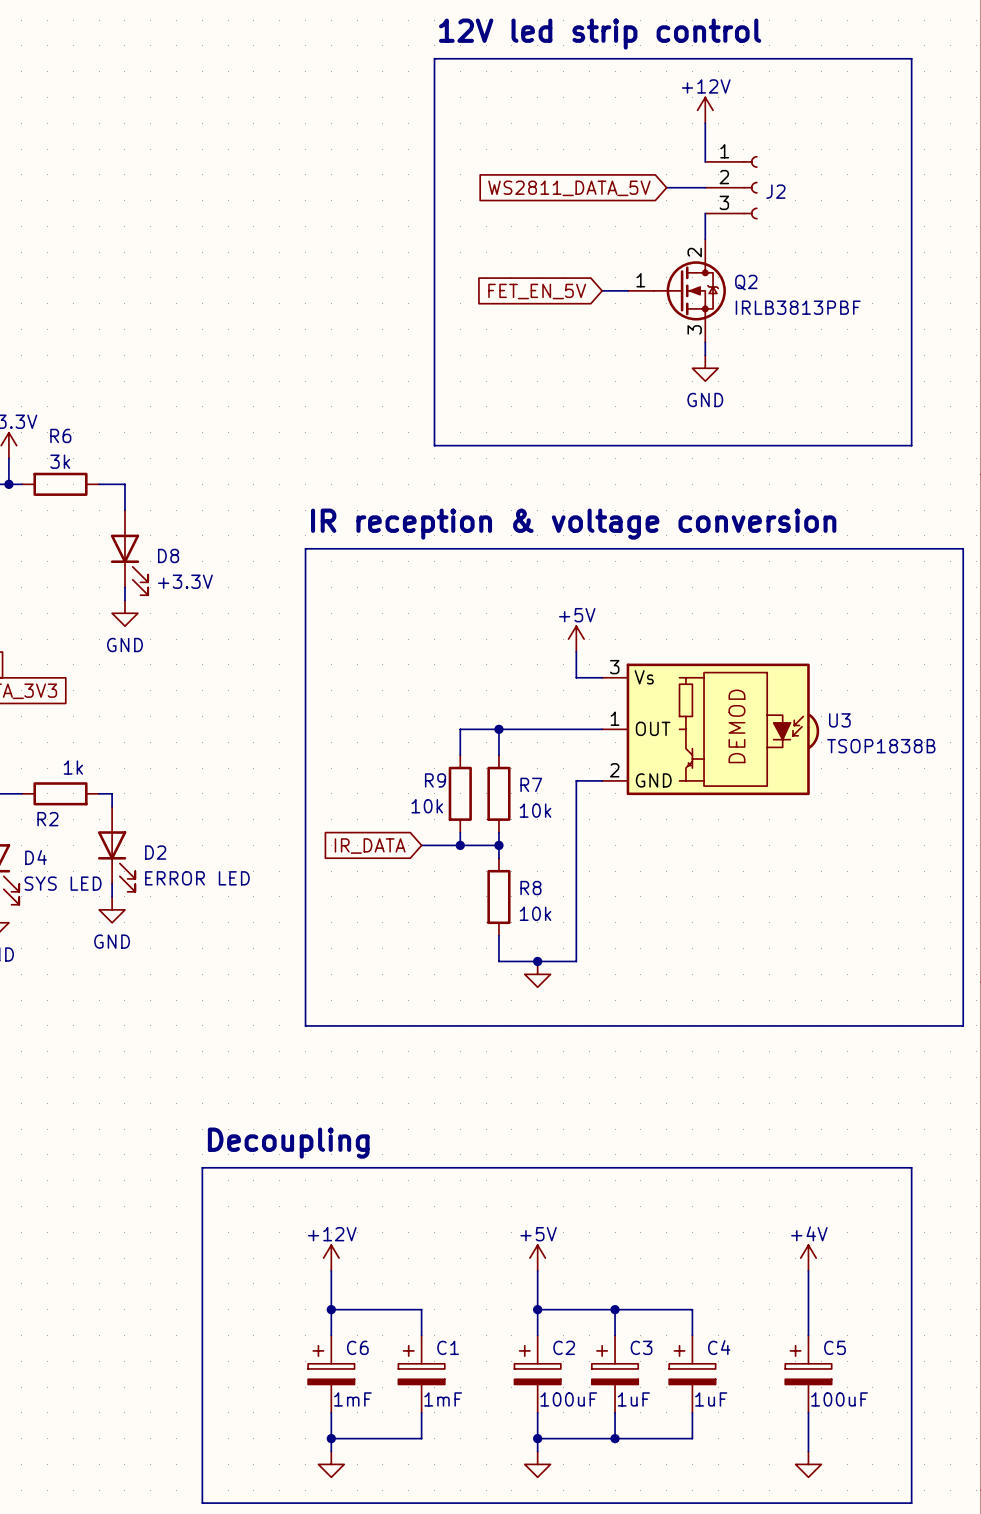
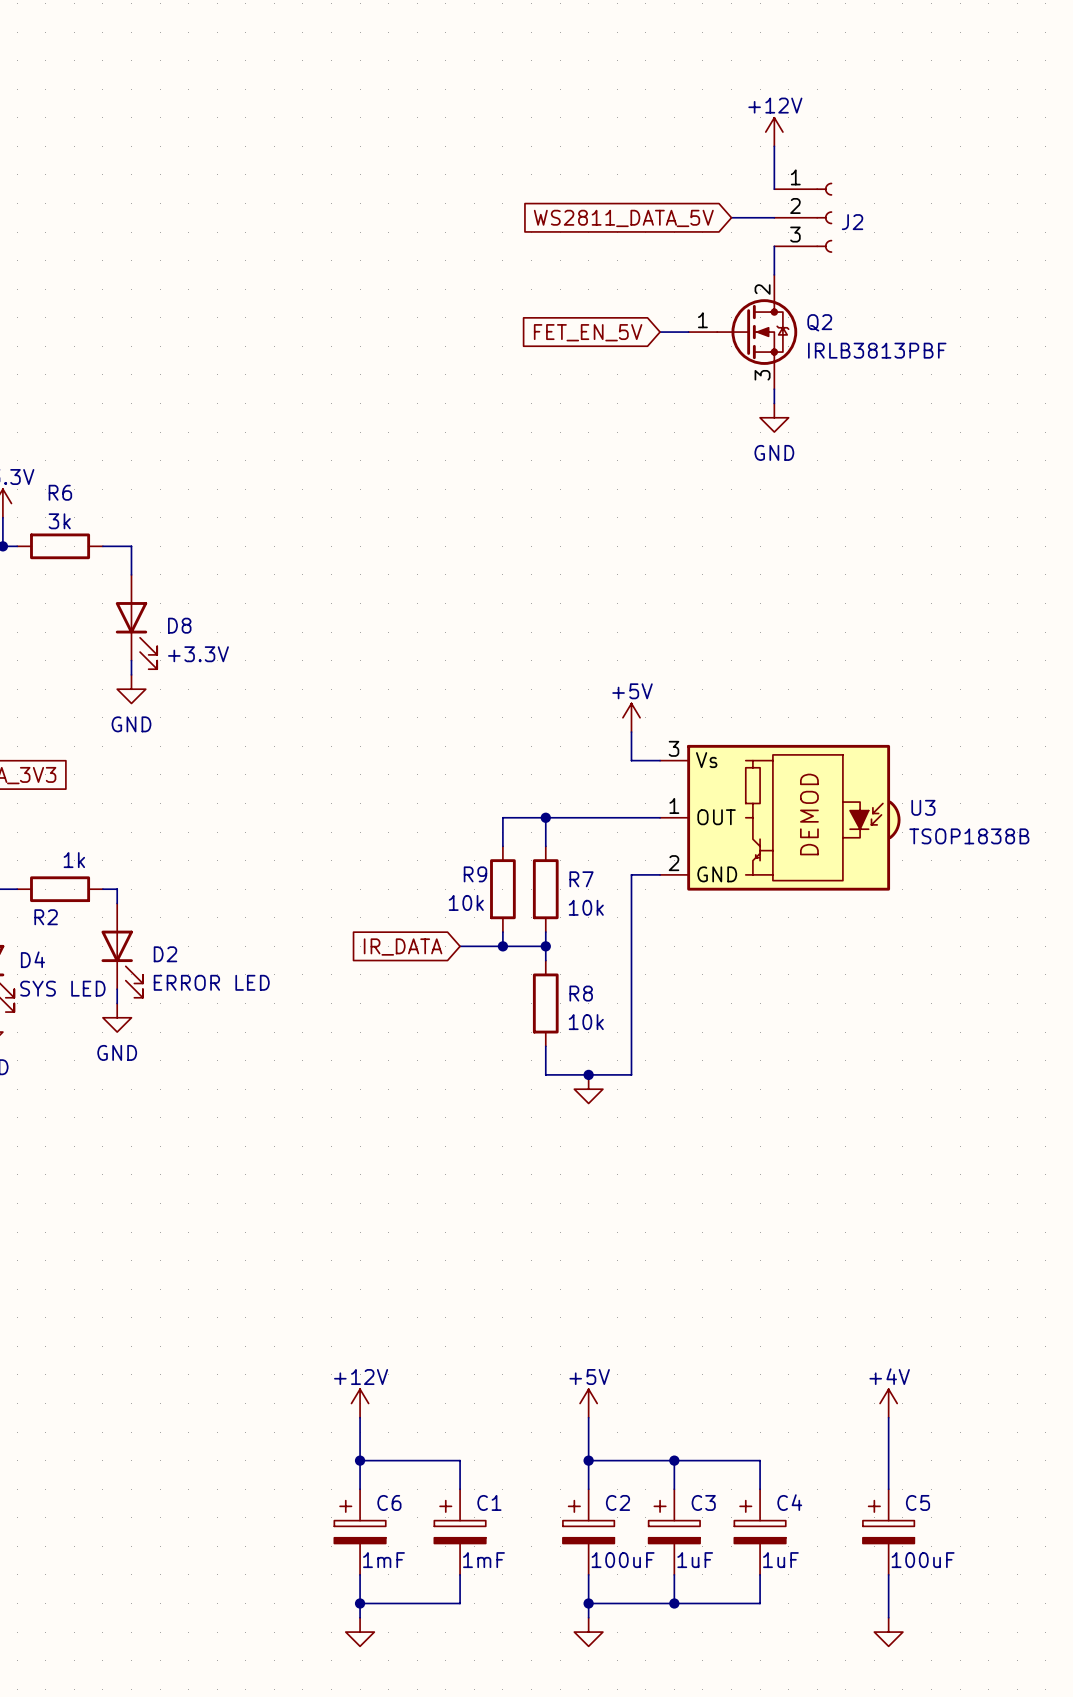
text: 12V led strip control (600, 34) -> none
line: (434, 58) (434, 445) (911, 445) (911, 58) (434, 58) -> none
text: IR reception & voltage conversion (573, 524) -> none
line: (305, 548) (305, 1025) (963, 1025) (963, 548) (305, 548) -> none
text: Decoupling (288, 1143) -> none
line: (202, 1167) (202, 1503) (911, 1503) (911, 1167) (202, 1167) -> none

